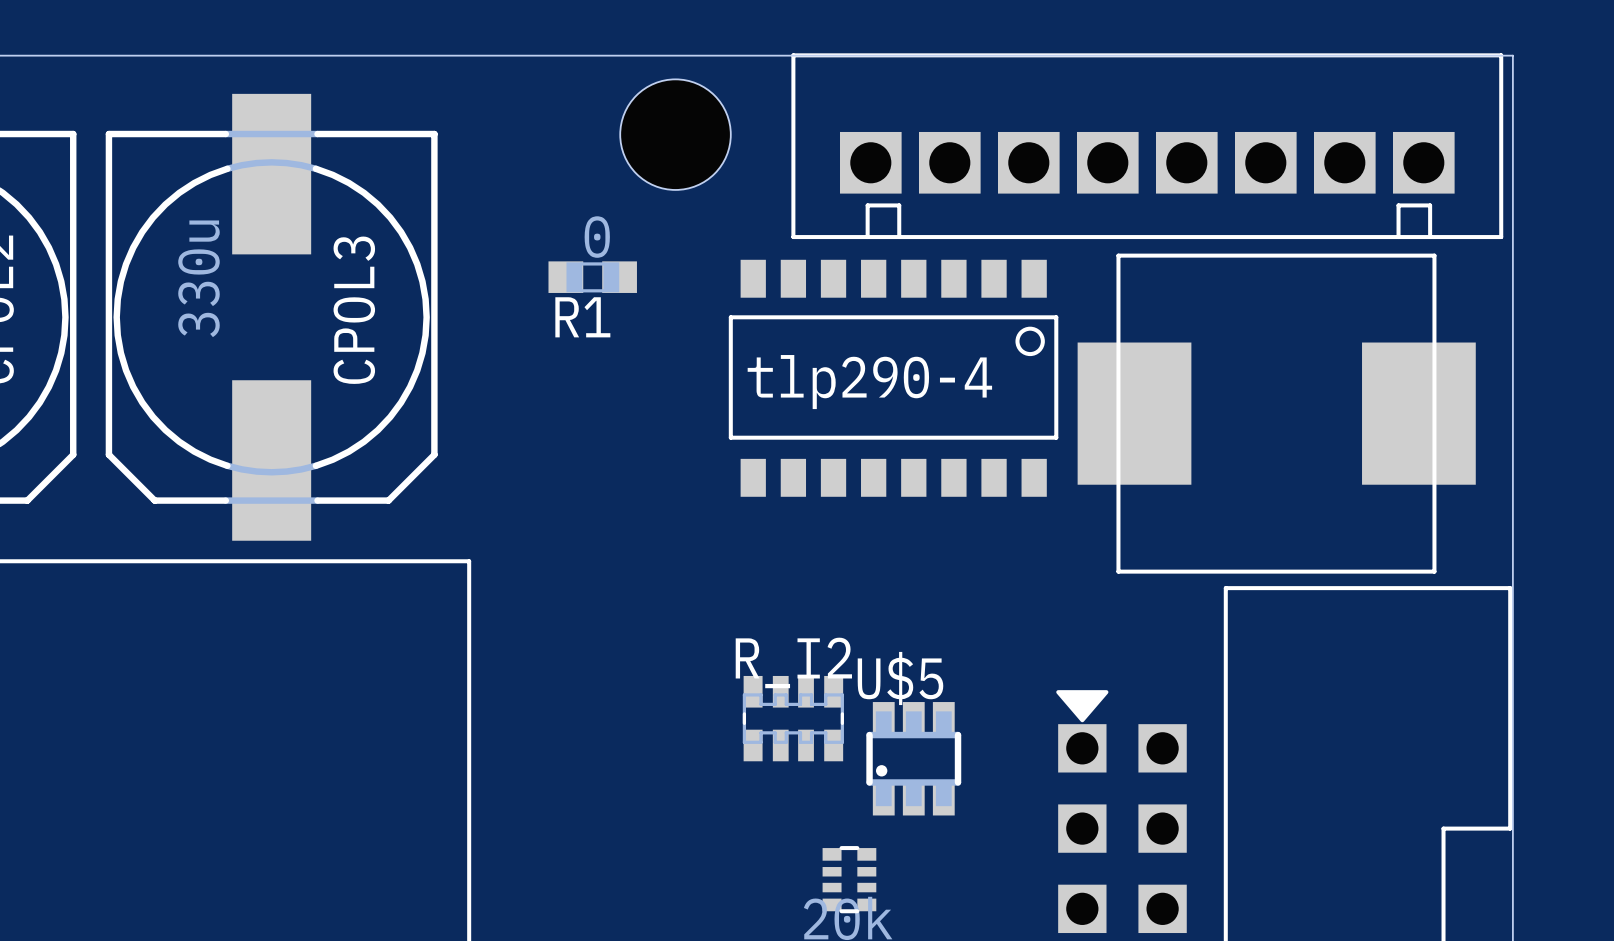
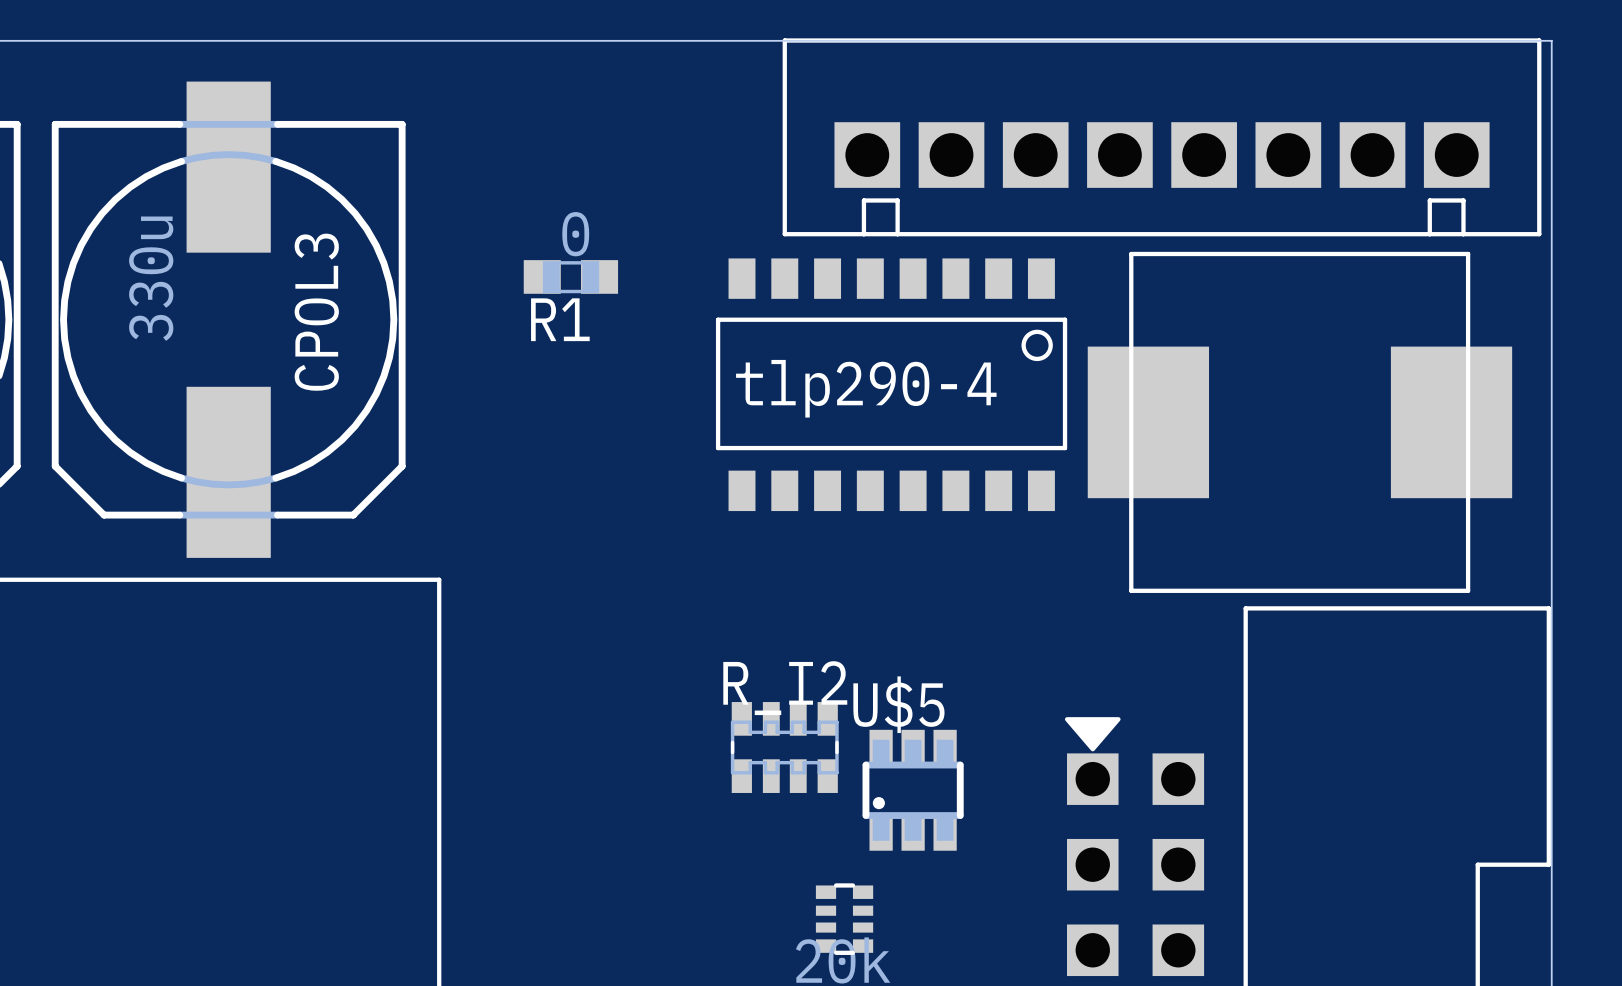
hole: (675, 134) -> none

